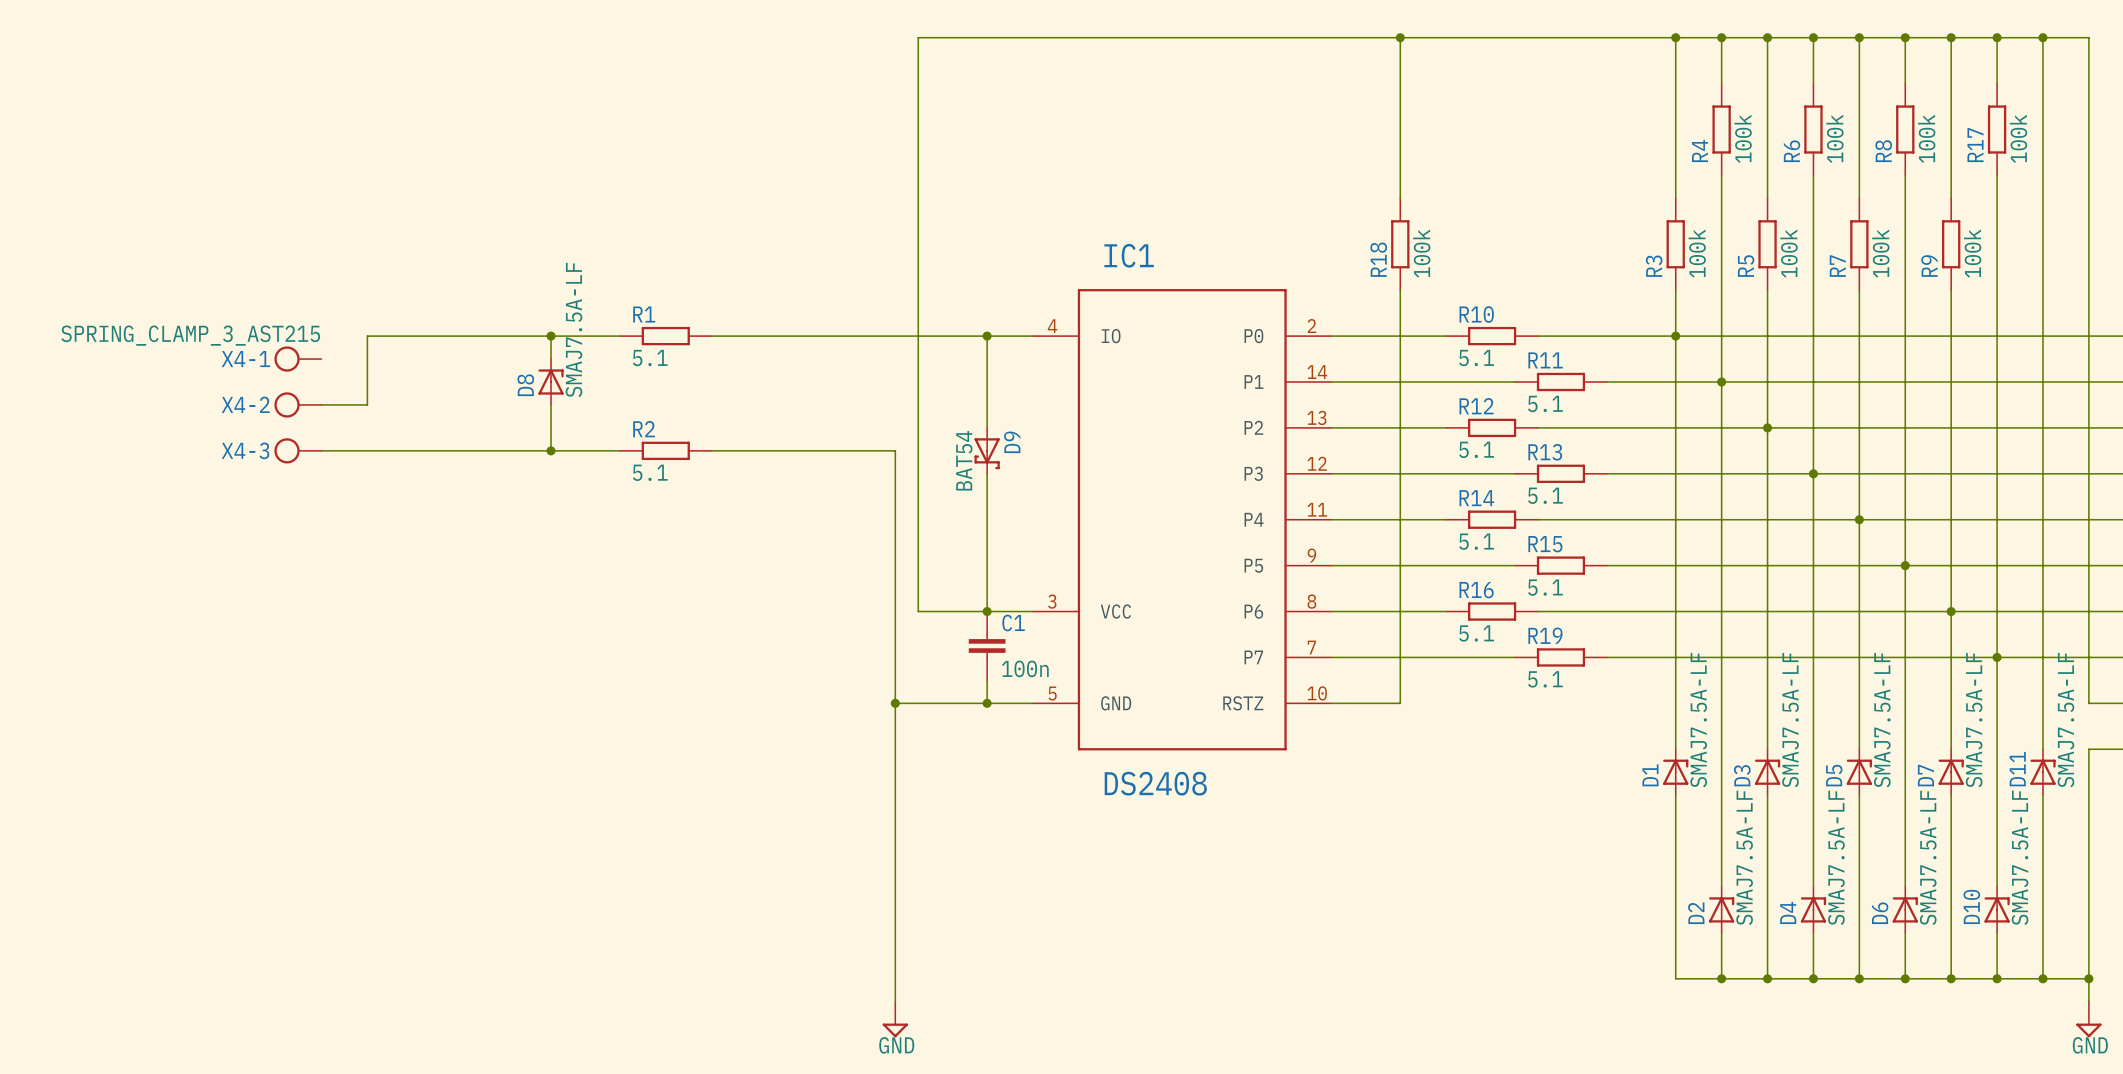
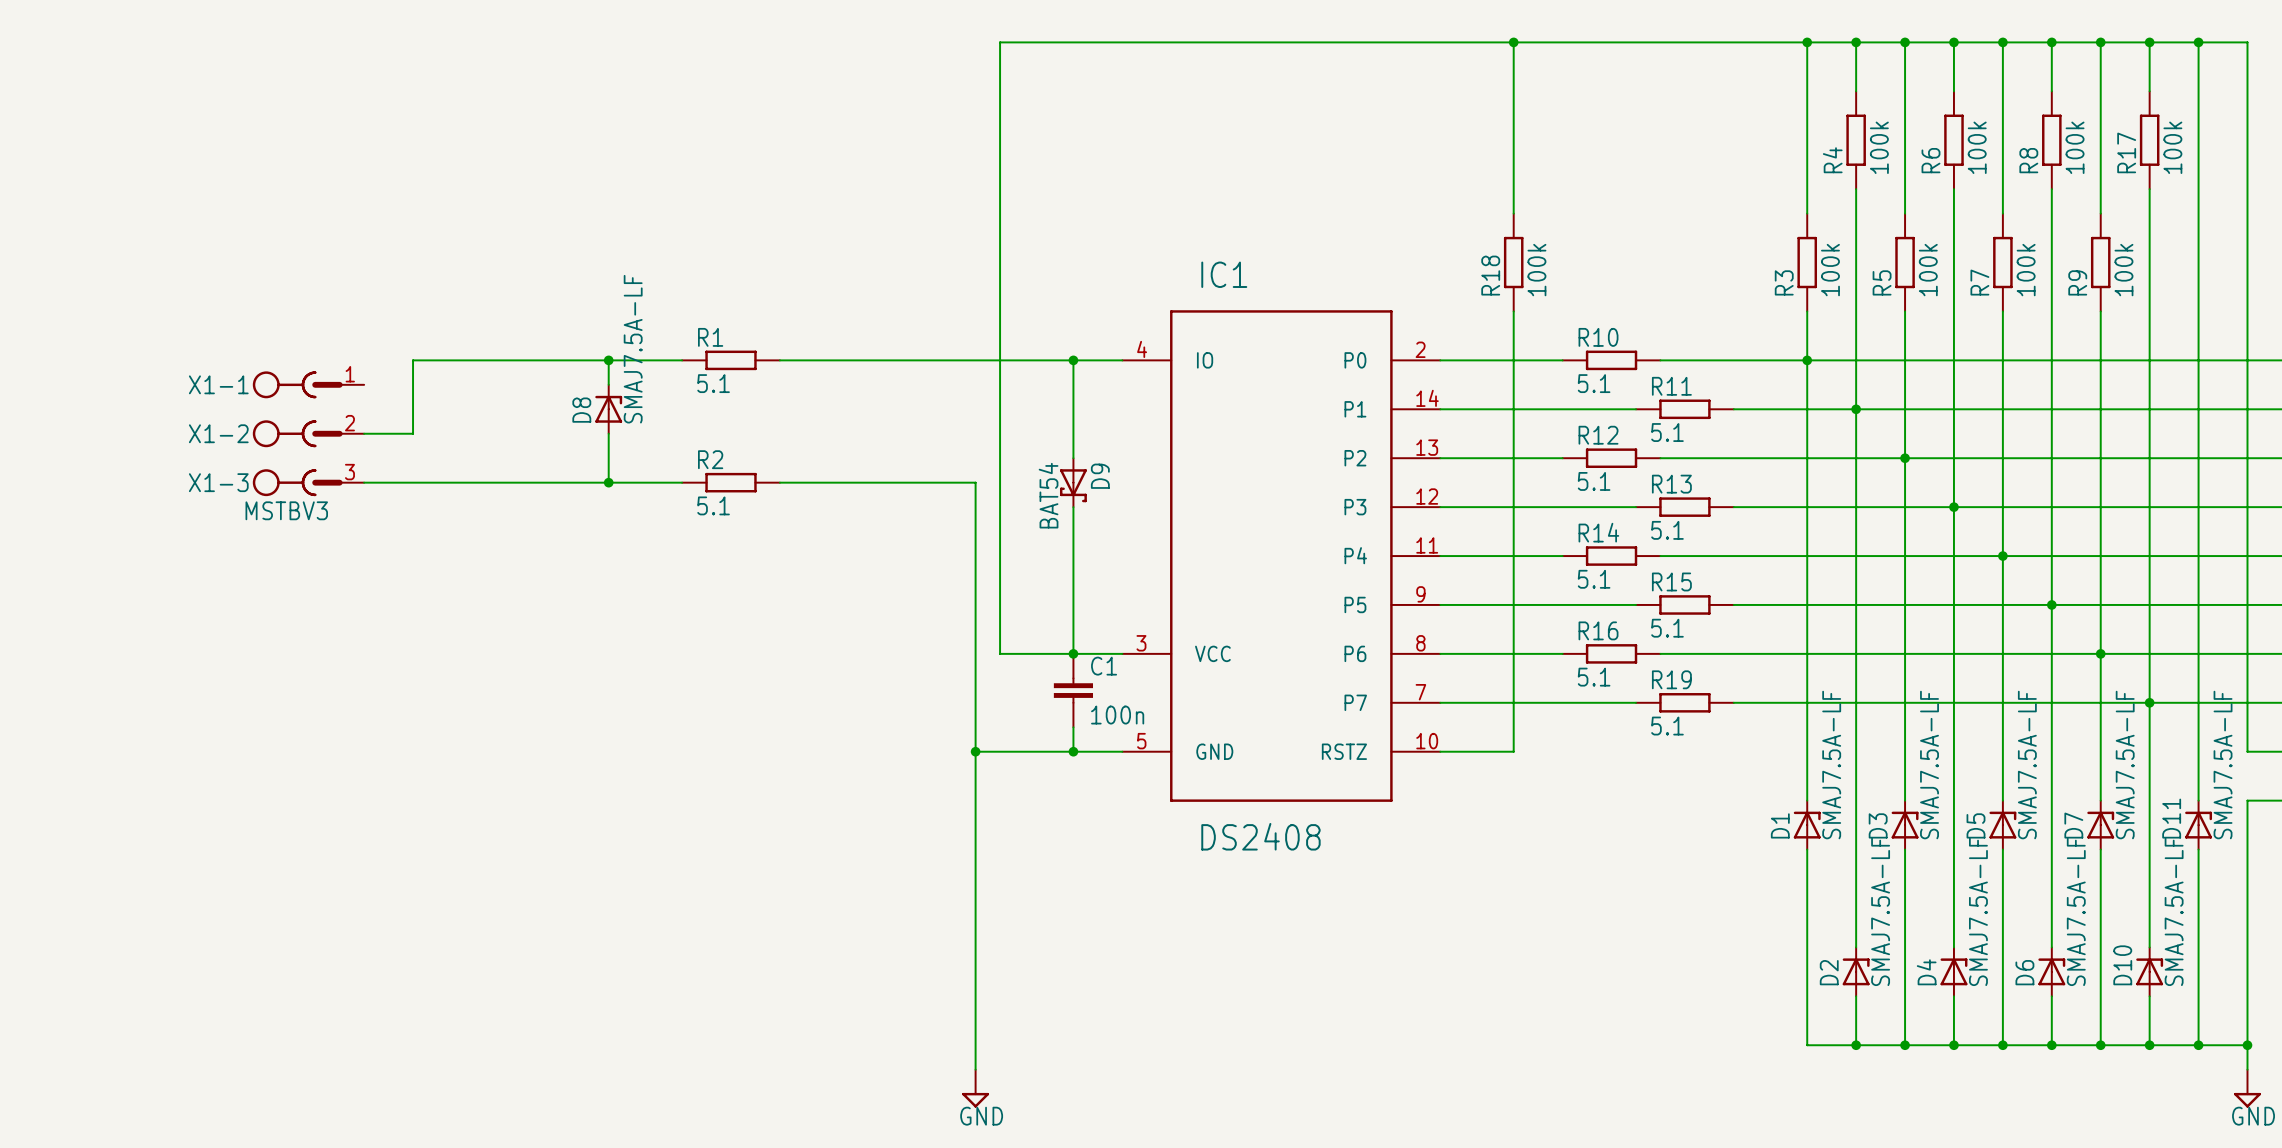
X1-1: none -> (308, 384)
X4-1: SPRING_CLAMP_3_AST215 (297, 359) -> none
X1-2: none -> (308, 433)
X4-2: (297, 404) -> none
X1-3: none -> MSTBV3 (308, 482)
X4-3: (297, 450) -> none

